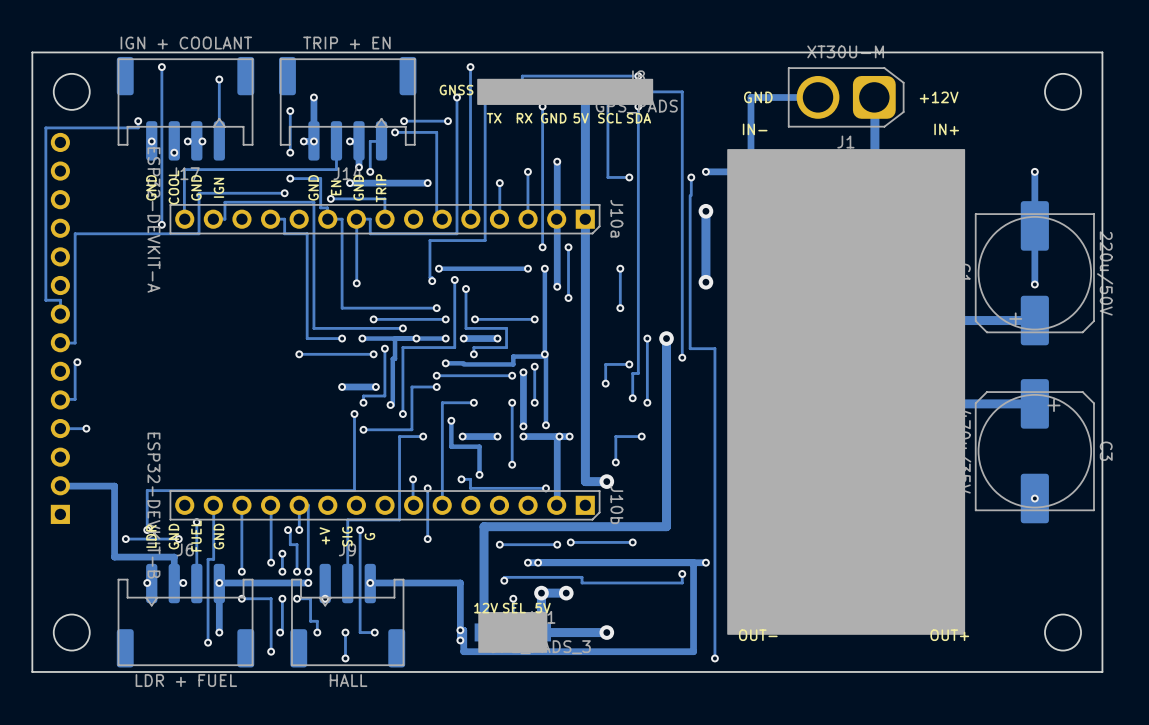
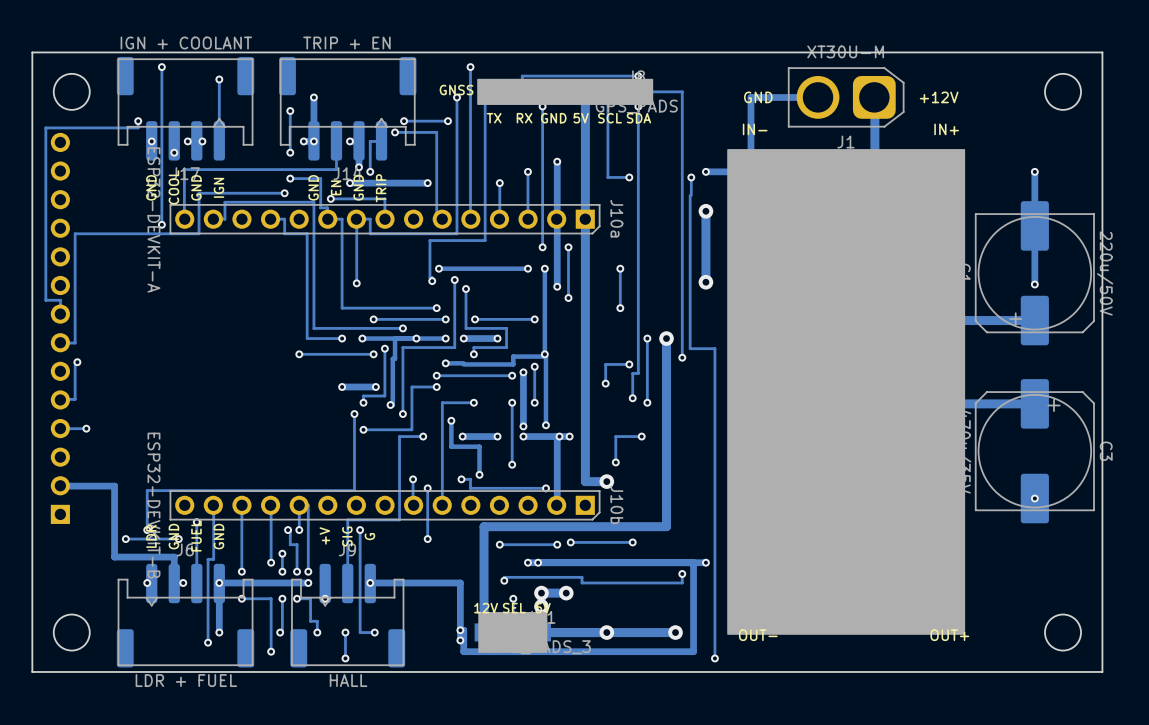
via: none -> (541, 606)
track: none -> (675, 632) (606, 632)
via: none -> (675, 632)

